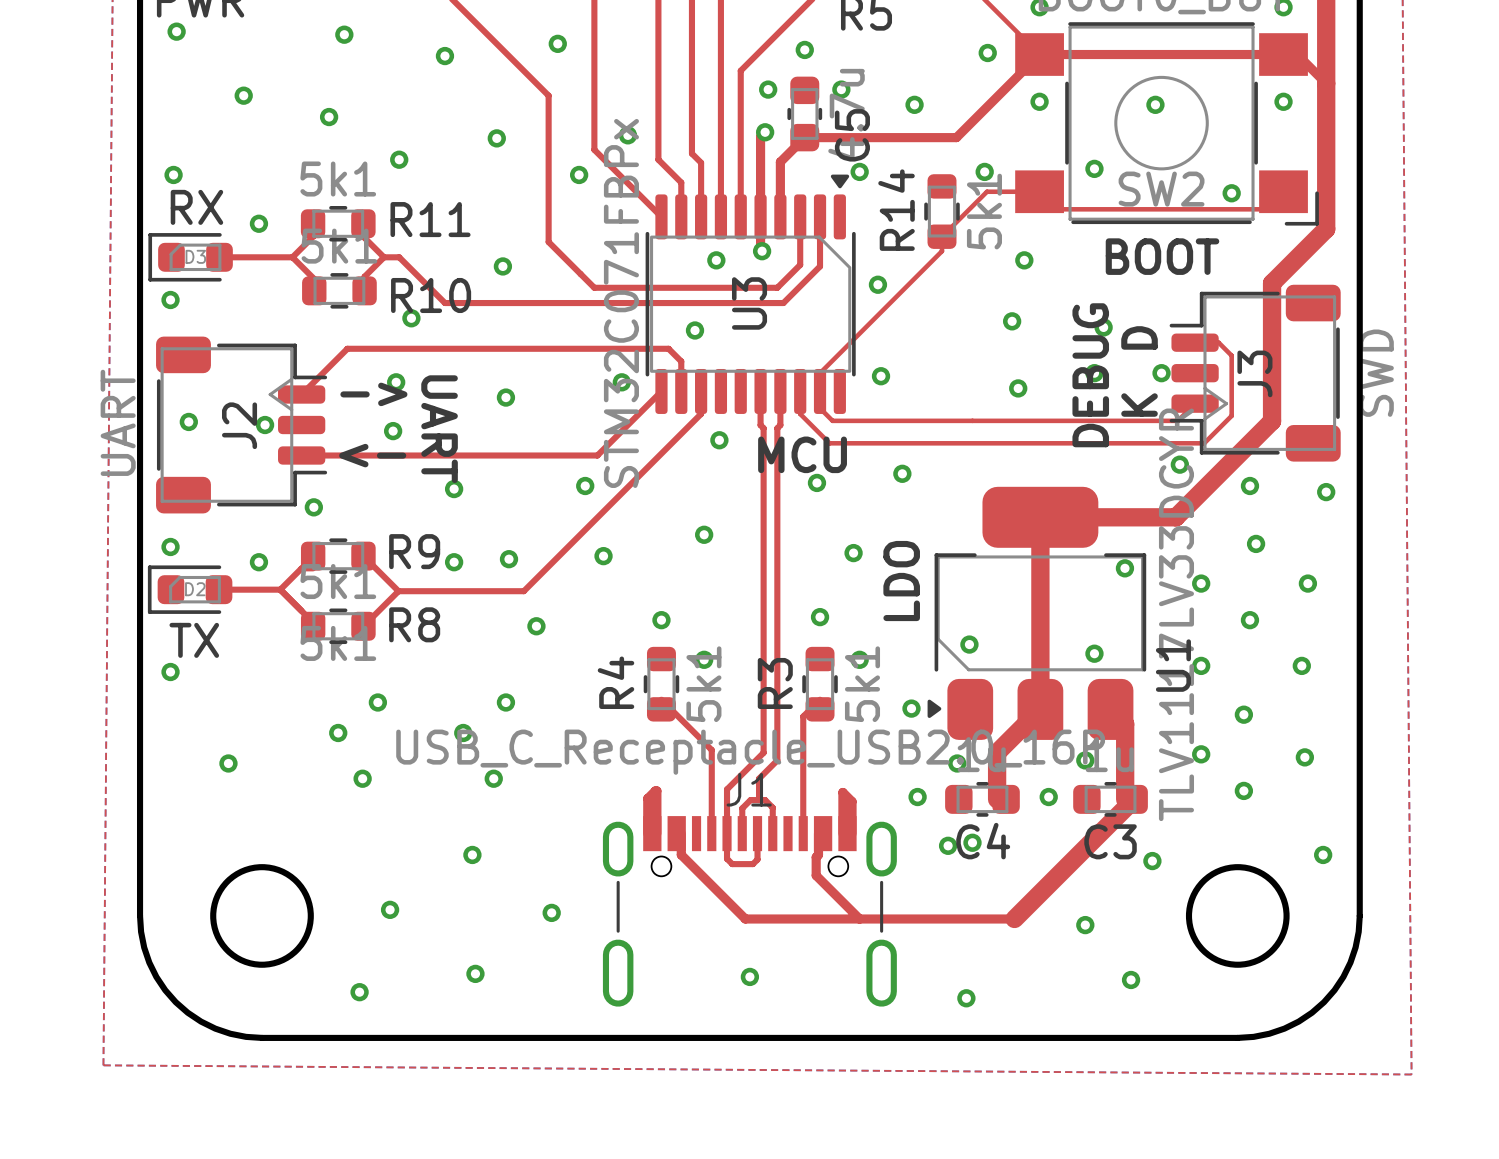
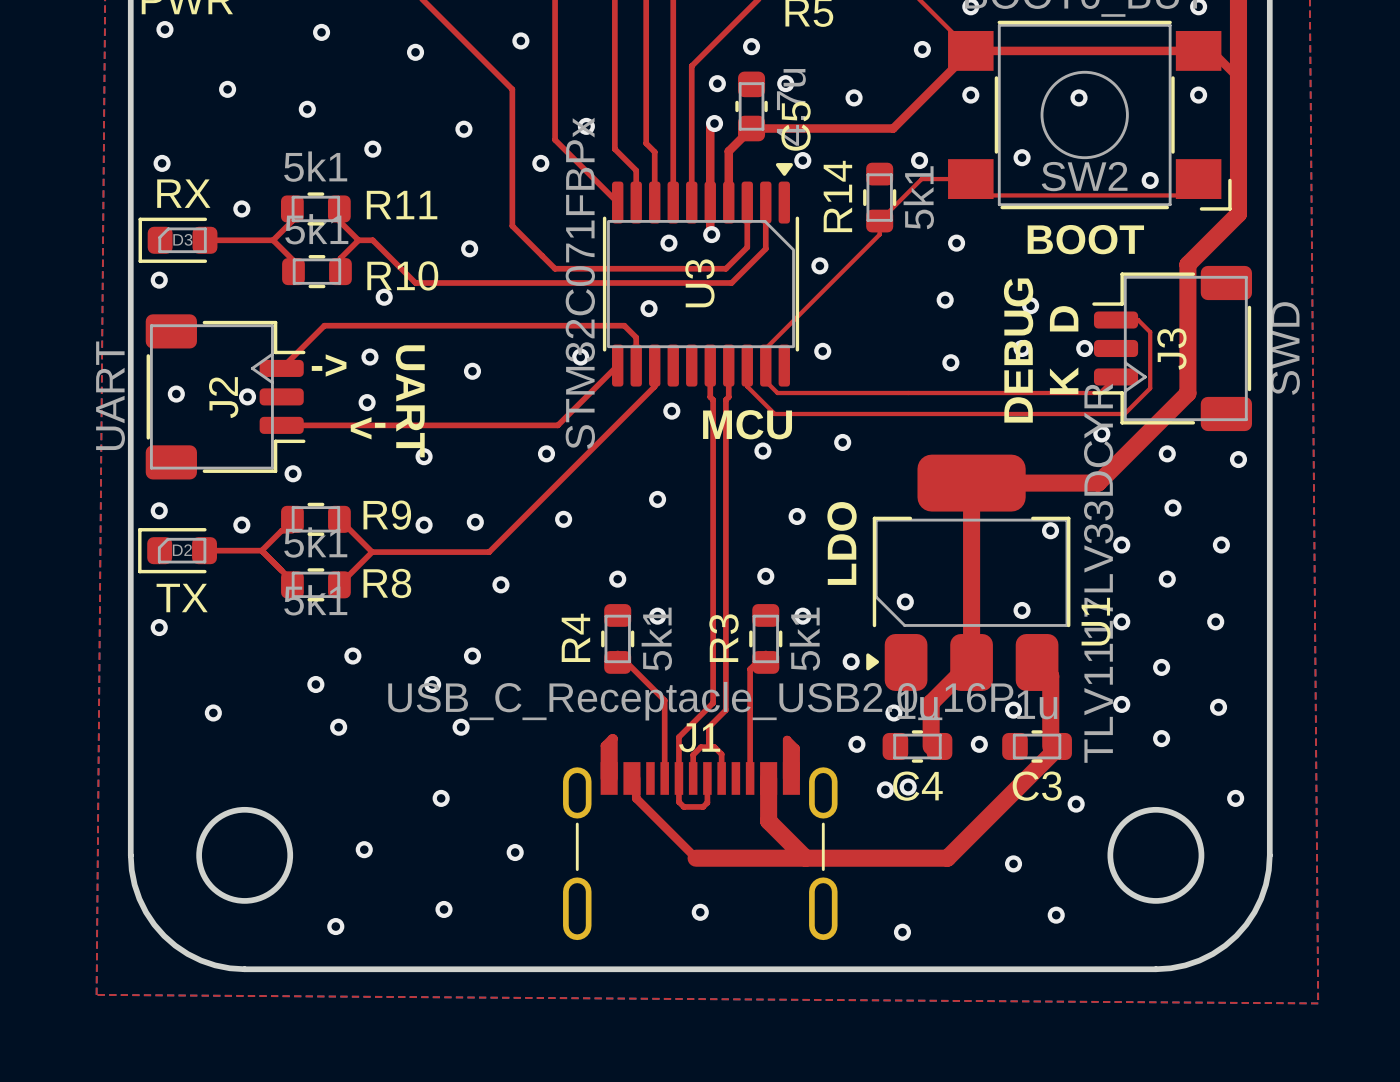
J1 footprint: [602, 816, 897, 1039] -> [563, 762, 838, 970]
top track: (818, 833) (816, 875) (859, 918) -> none
top track: none -> (768, 778) (768, 821) (805, 858)
top track width: thin (745, 918) (1014, 918) -> thick (696, 858) (947, 858)

